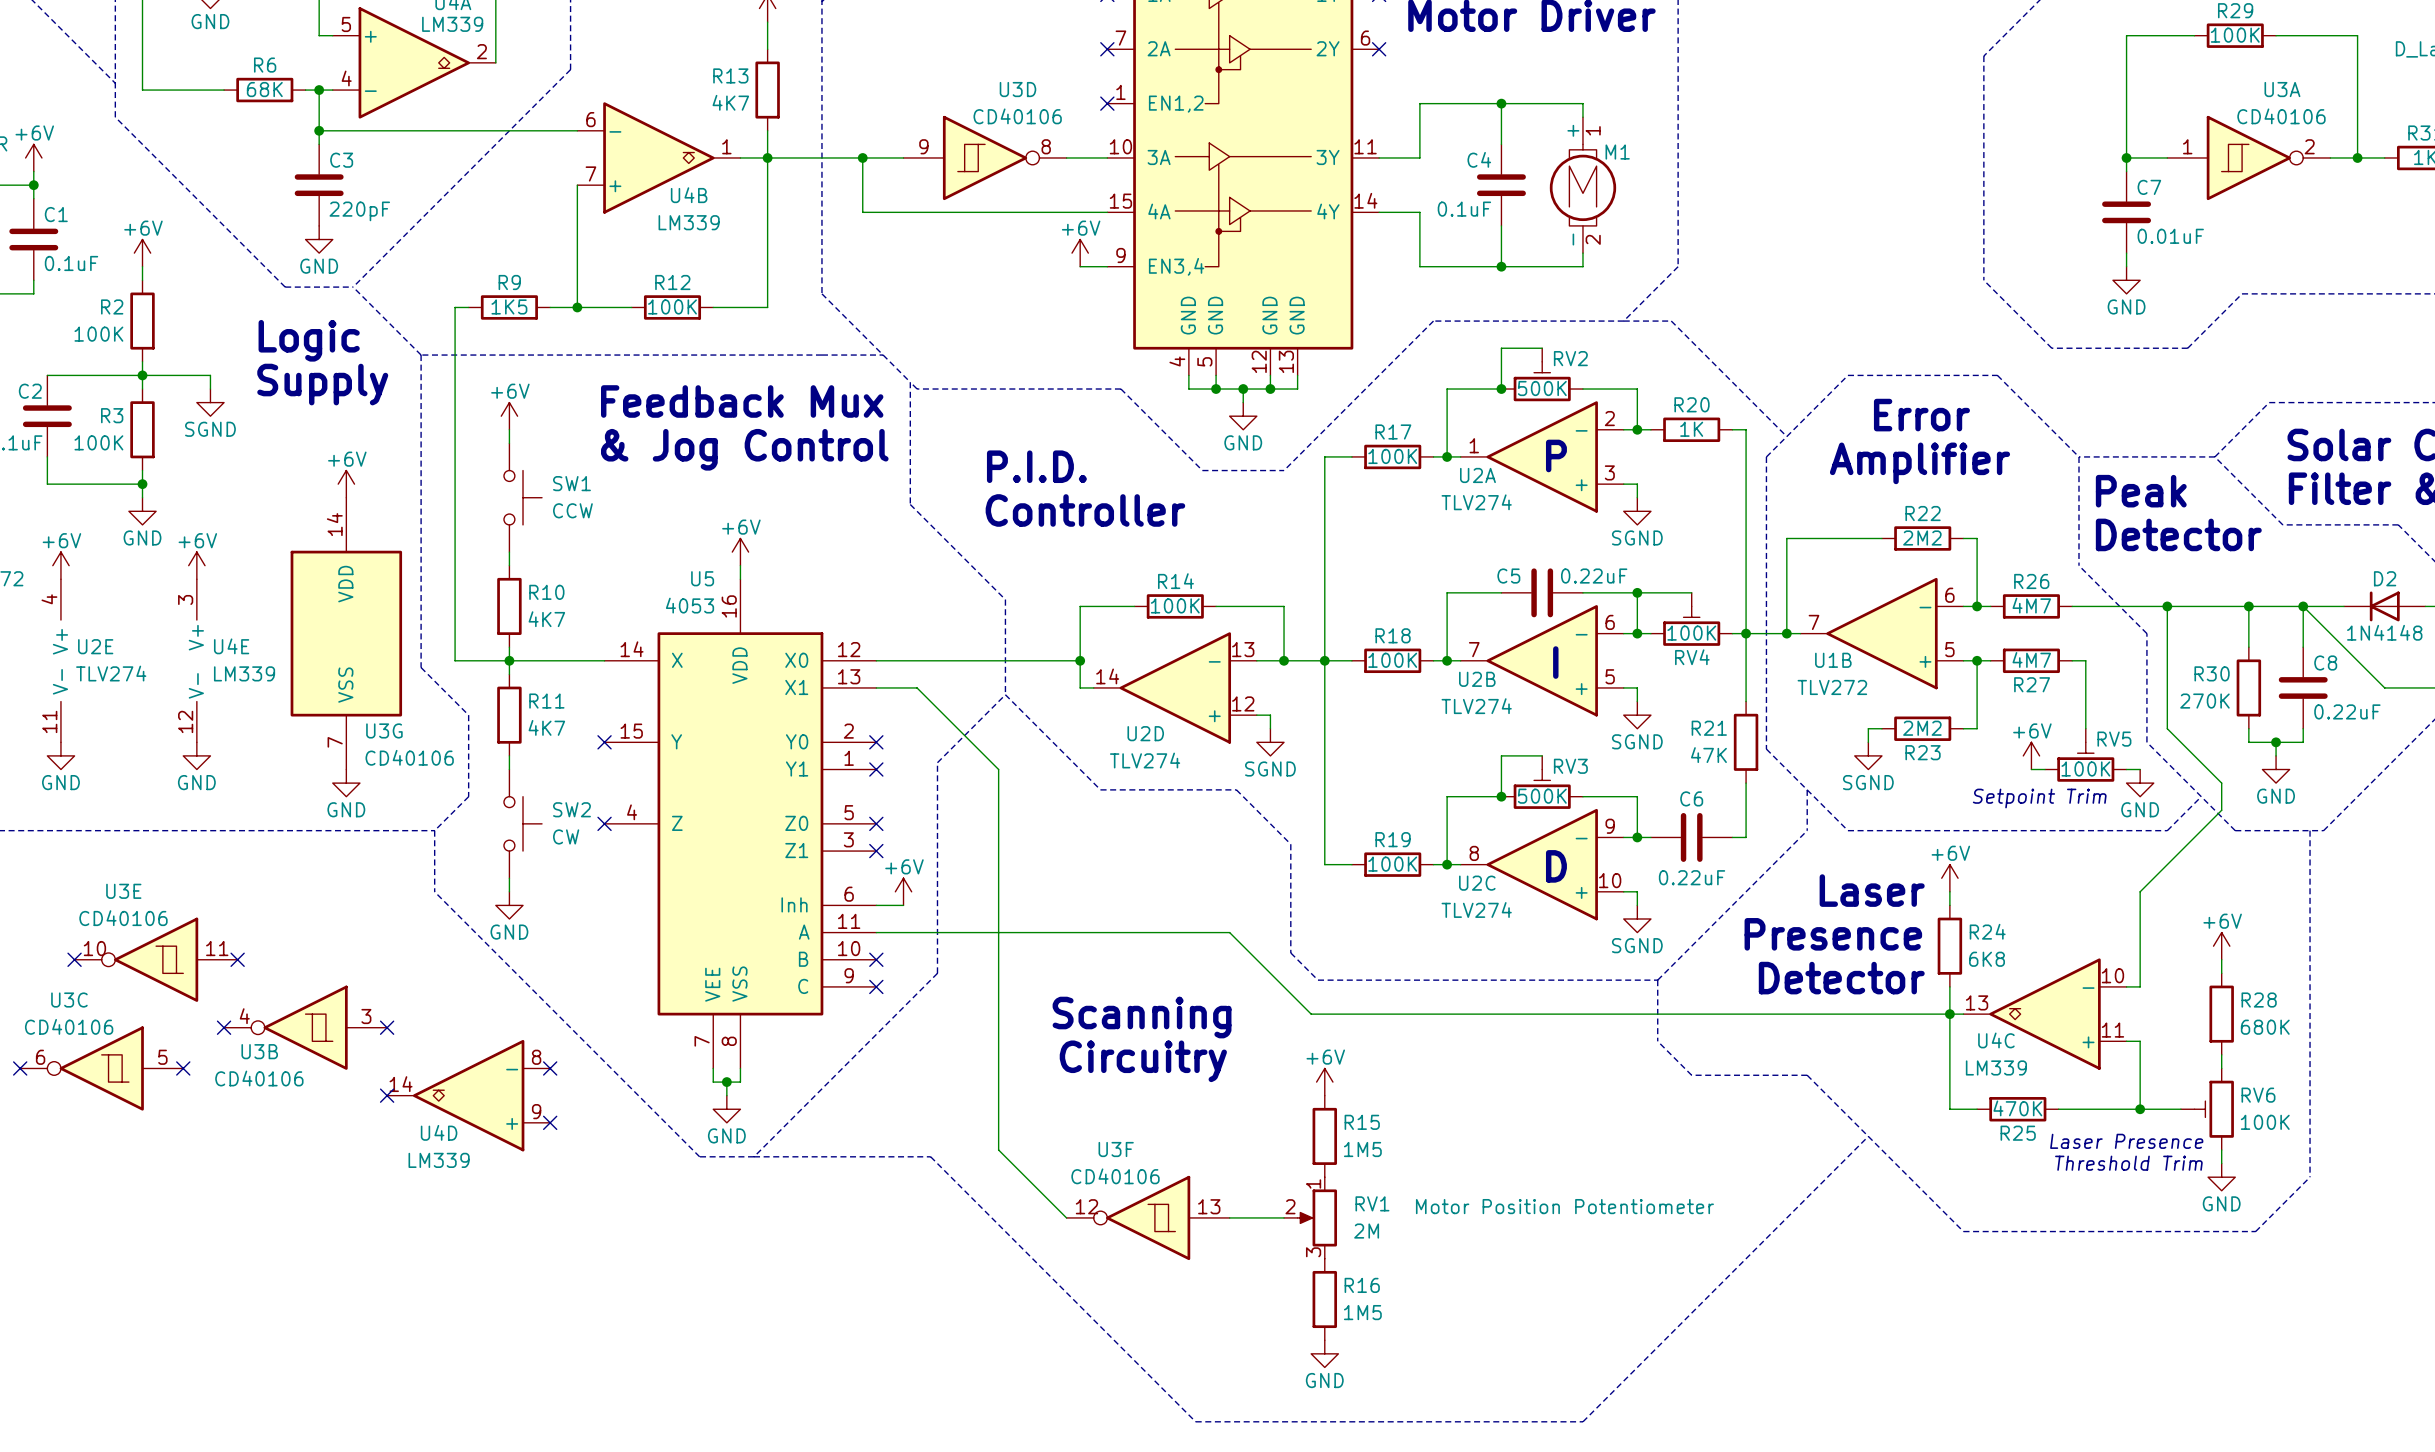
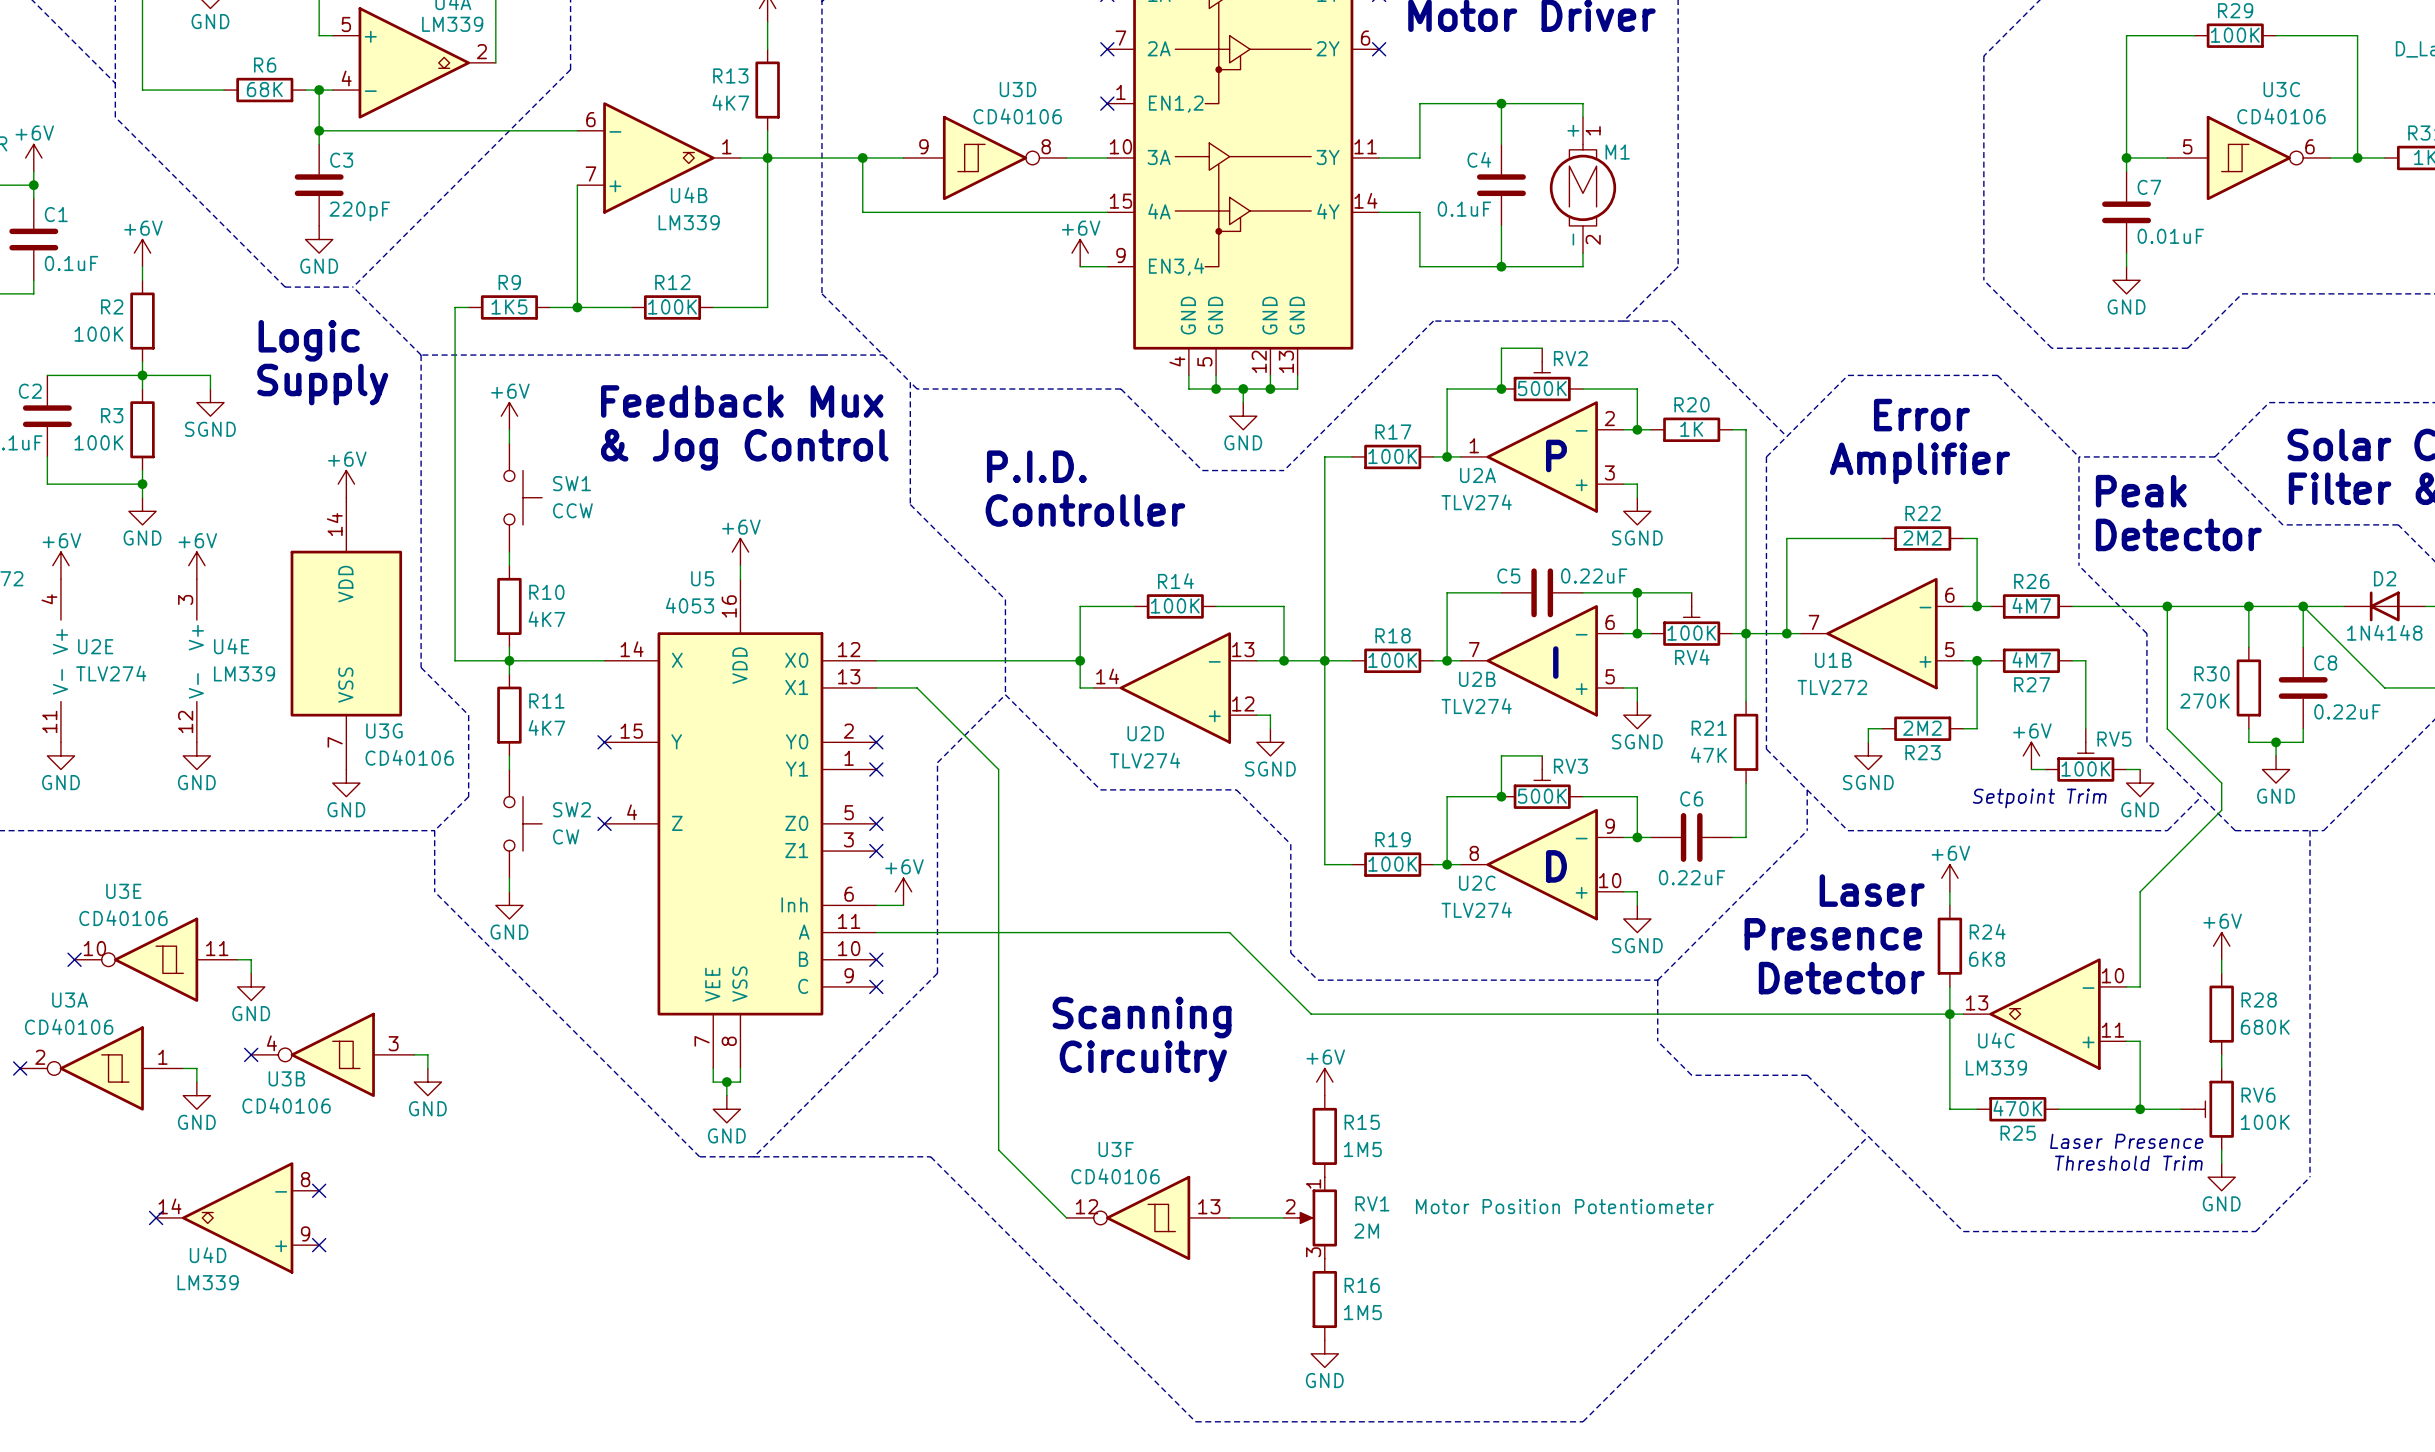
U3A flip: as is (2248, 157) -> left-right (101, 1068)
U3A position: (2248, 157) -> (101, 1068)
wire: none -> (237, 959) (251, 959) (251, 973)
no-connect mark: (237, 959) -> none
power symbol: none -> GND (251, 986)
no-connect mark: (224, 1027) -> none
U3B position: (305, 1027) -> (332, 1054)
no-connect mark: (387, 1027) -> none
no-connect mark: none -> (251, 1054)
wire: none -> (414, 1054) (427, 1054) (427, 1068)
U3C flip: as is (101, 1068) -> left-right (2248, 157)
U3C position: (101, 1068) -> (2248, 157)
wire: none -> (183, 1068) (196, 1068) (196, 1082)
no-connect mark: (183, 1068) -> none
no-connect mark: (550, 1068) -> none
power symbol: none -> GND (427, 1082)
power symbol: none -> GND (196, 1095)
no-connect mark: (387, 1095) -> none
U4D position: (468, 1095) -> (237, 1217)
no-connect mark: (550, 1122) -> none
no-connect mark: none -> (319, 1190)
no-connect mark: none -> (156, 1217)
no-connect mark: none -> (319, 1245)

